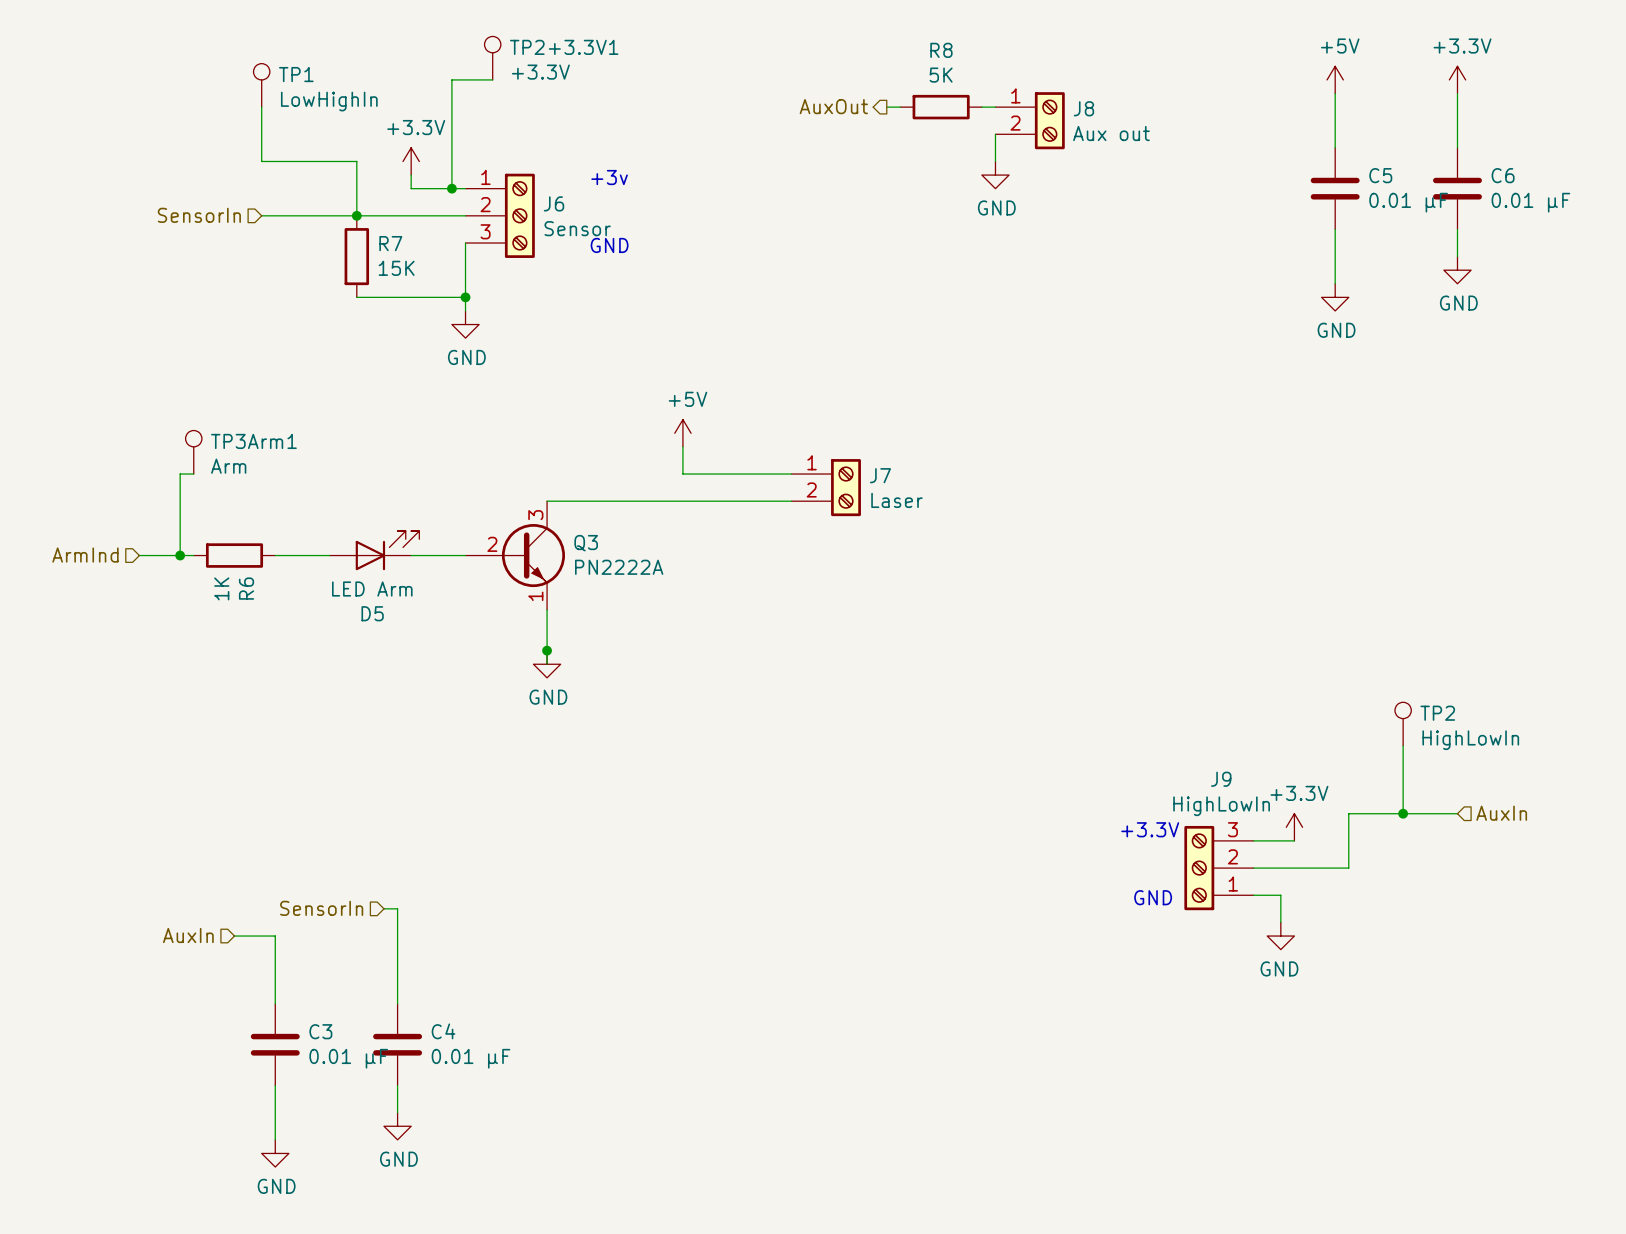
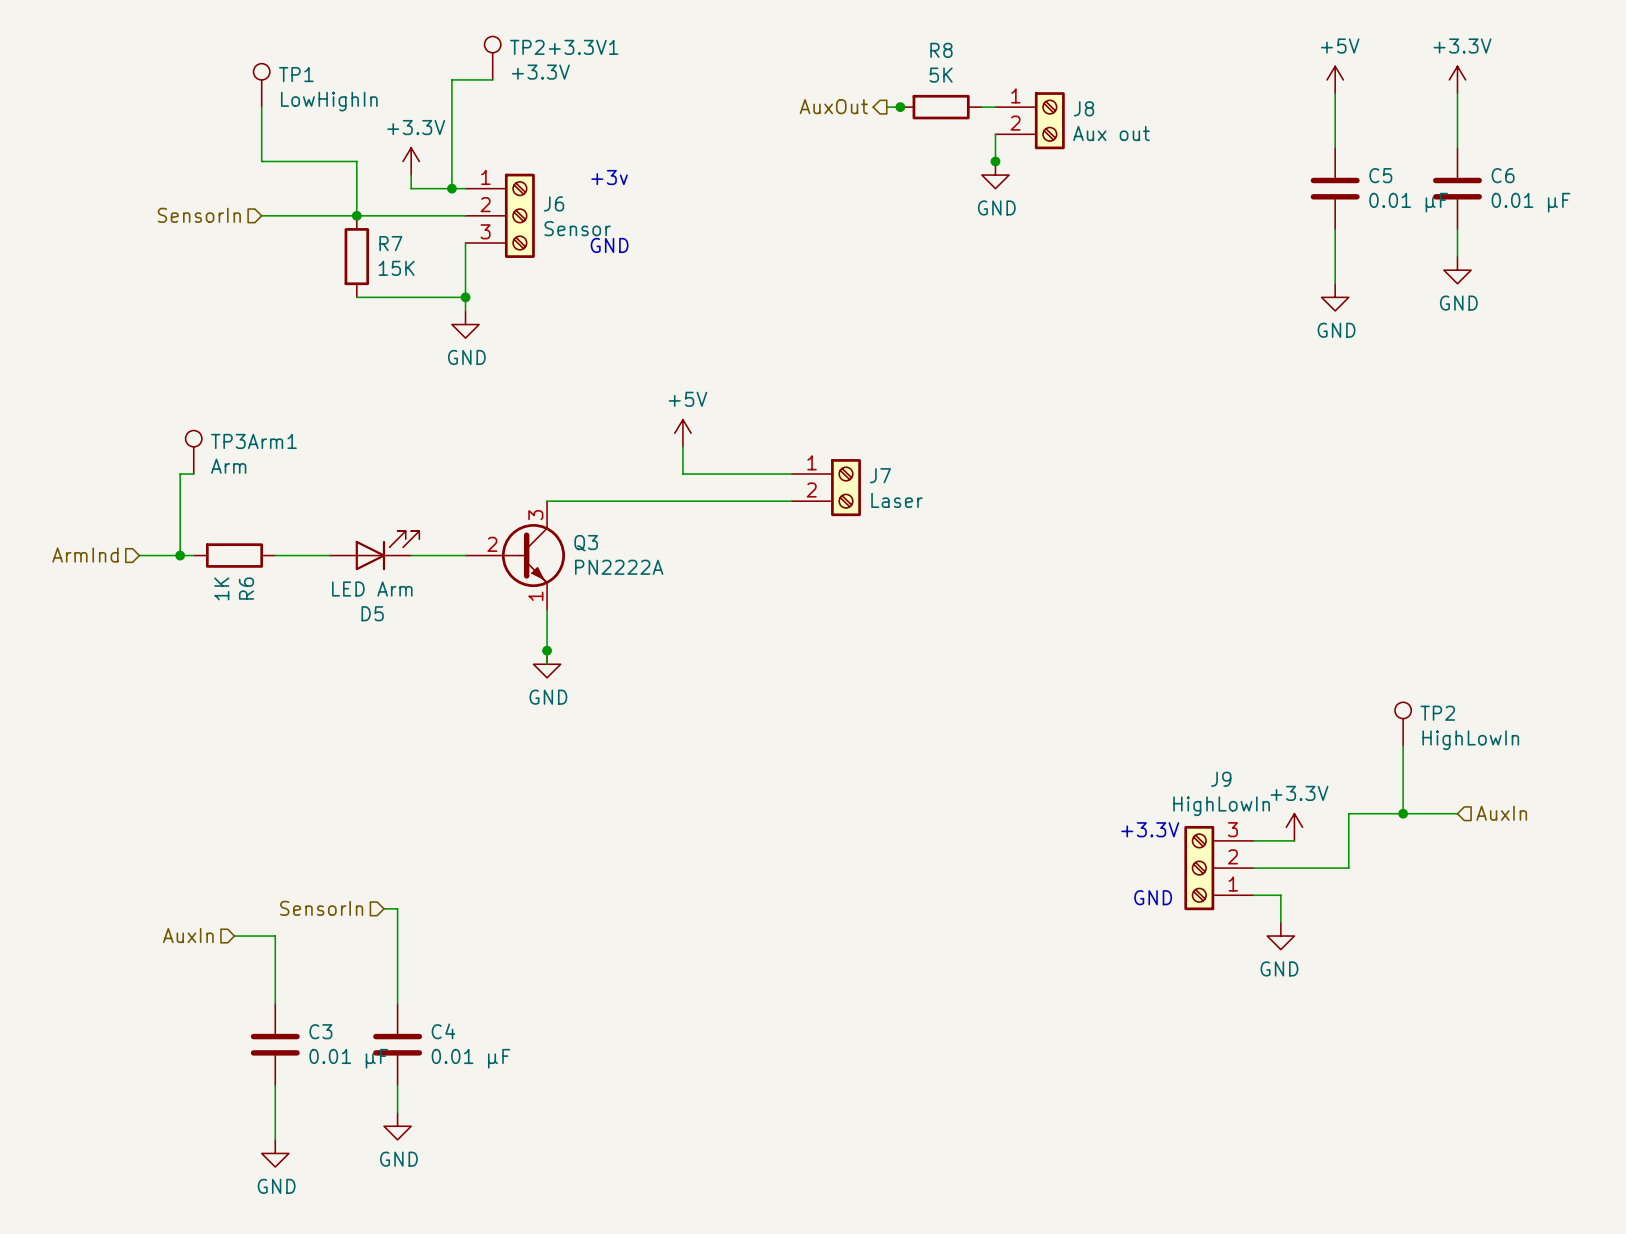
junction: none -> (900, 107)
junction: none -> (995, 161)

